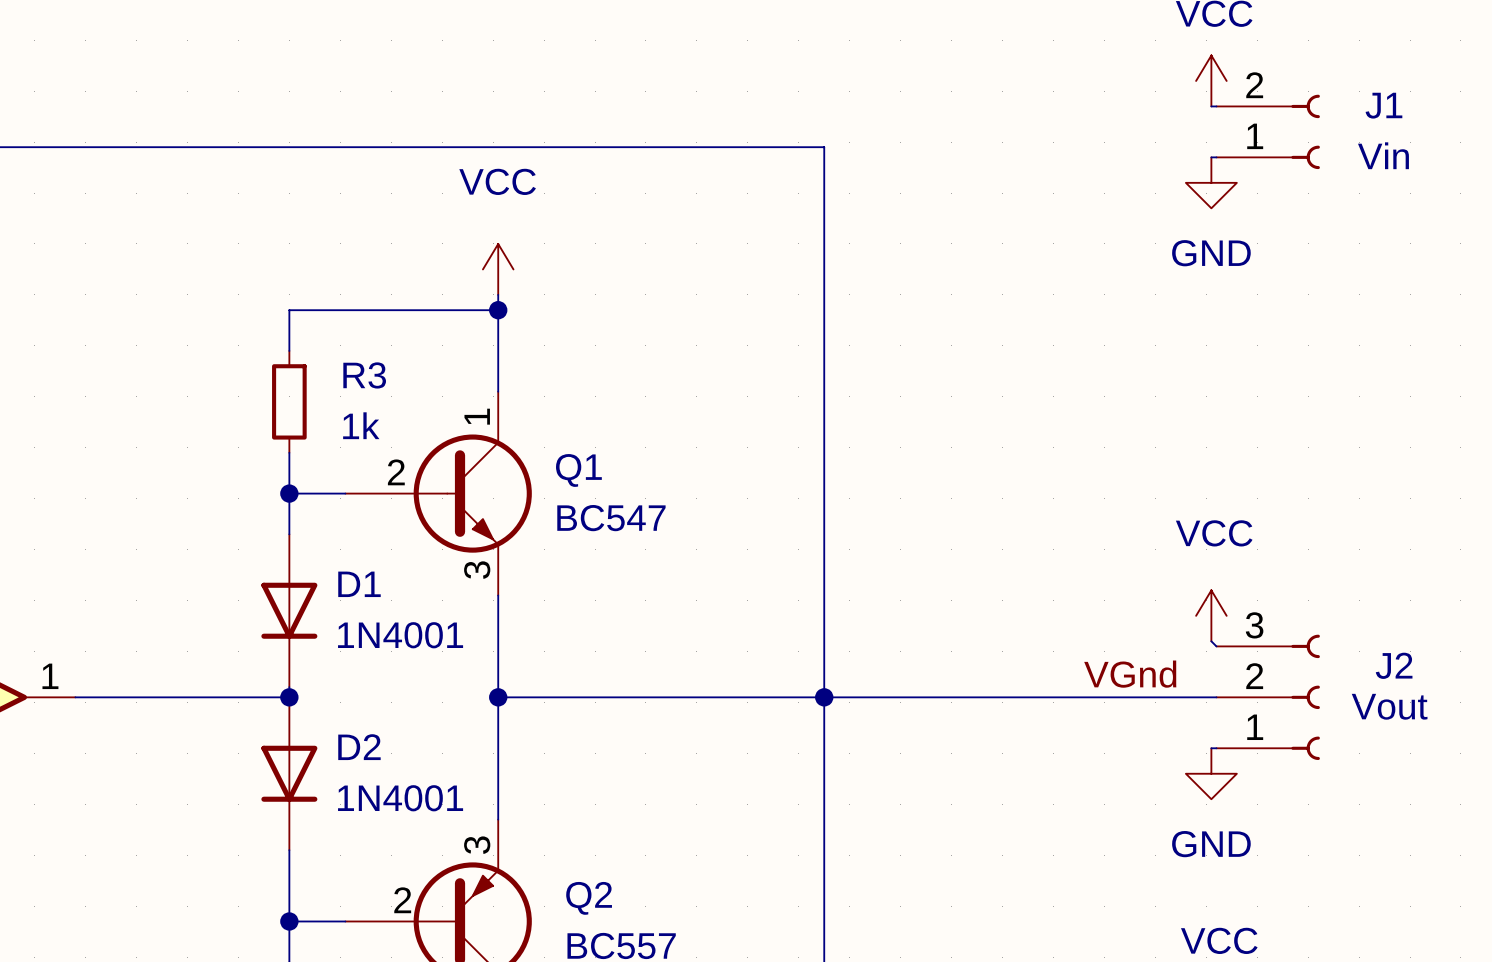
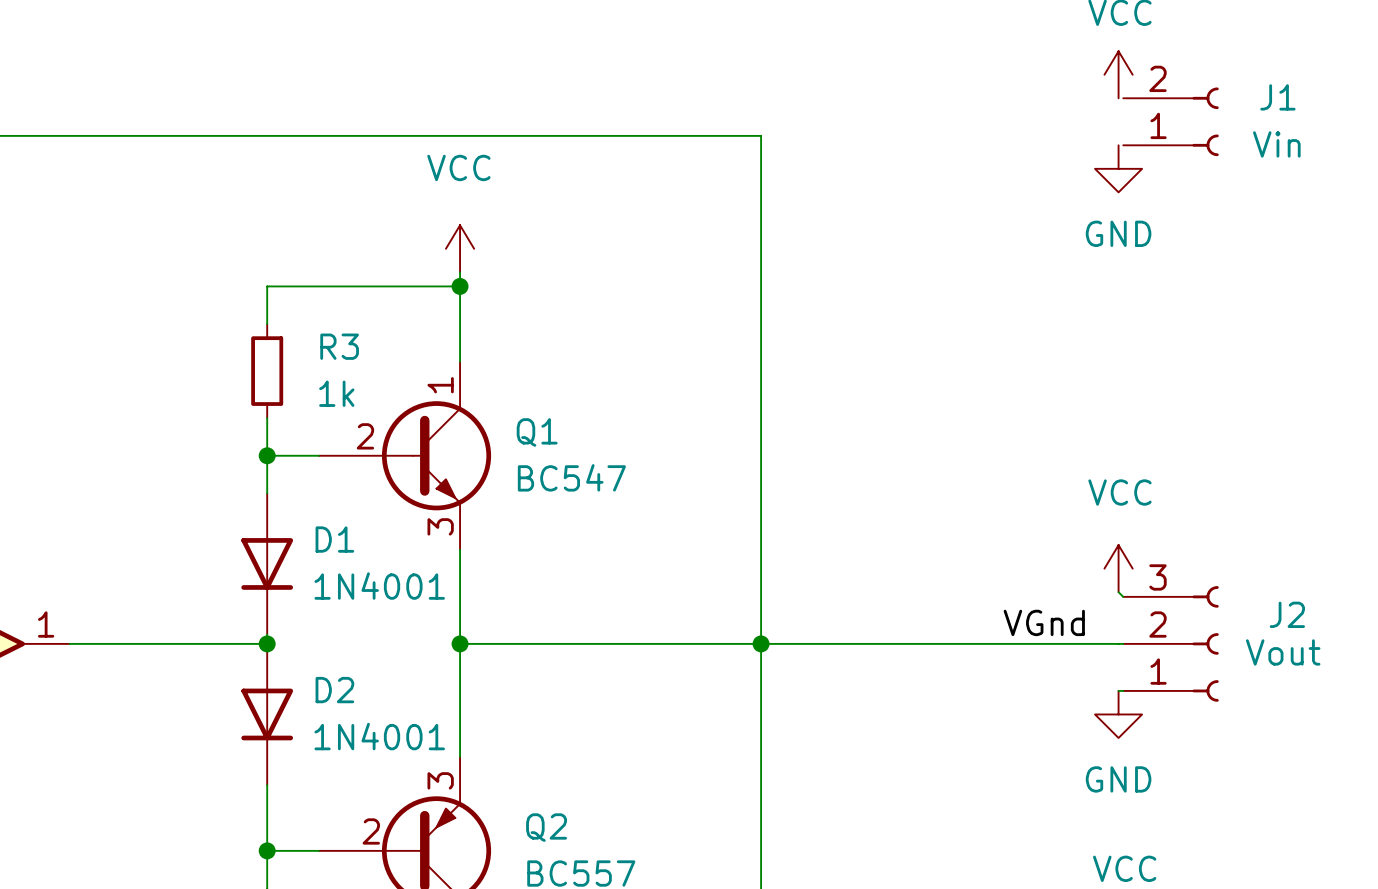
wire: (1211, 106) (1216, 106) -> none
wire: (1211, 157) (1216, 157) -> none

